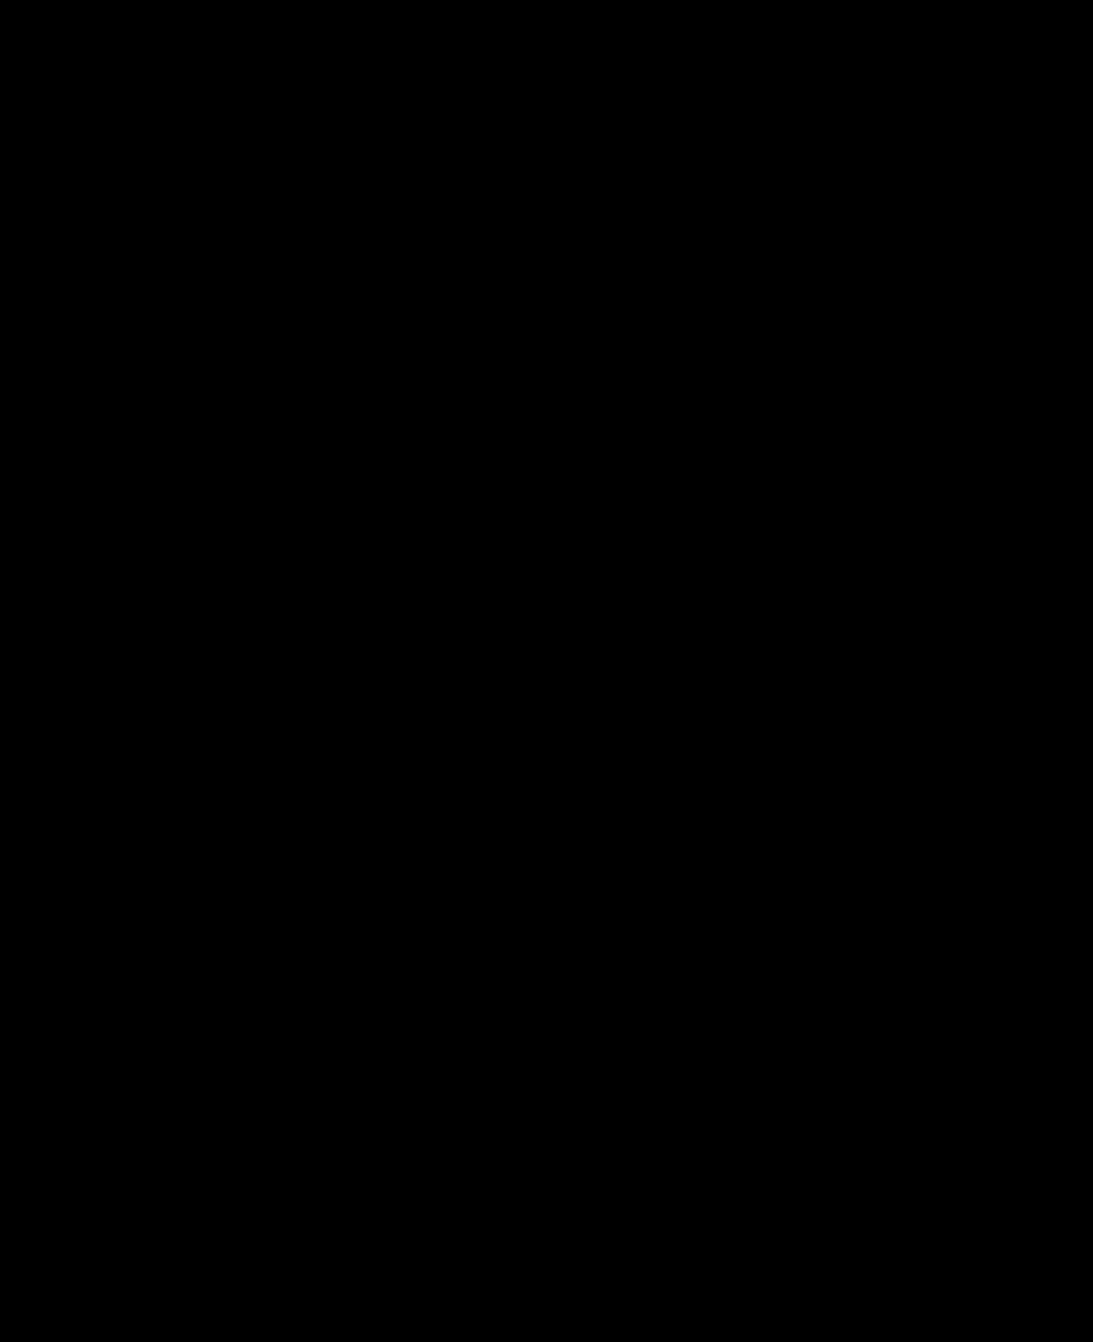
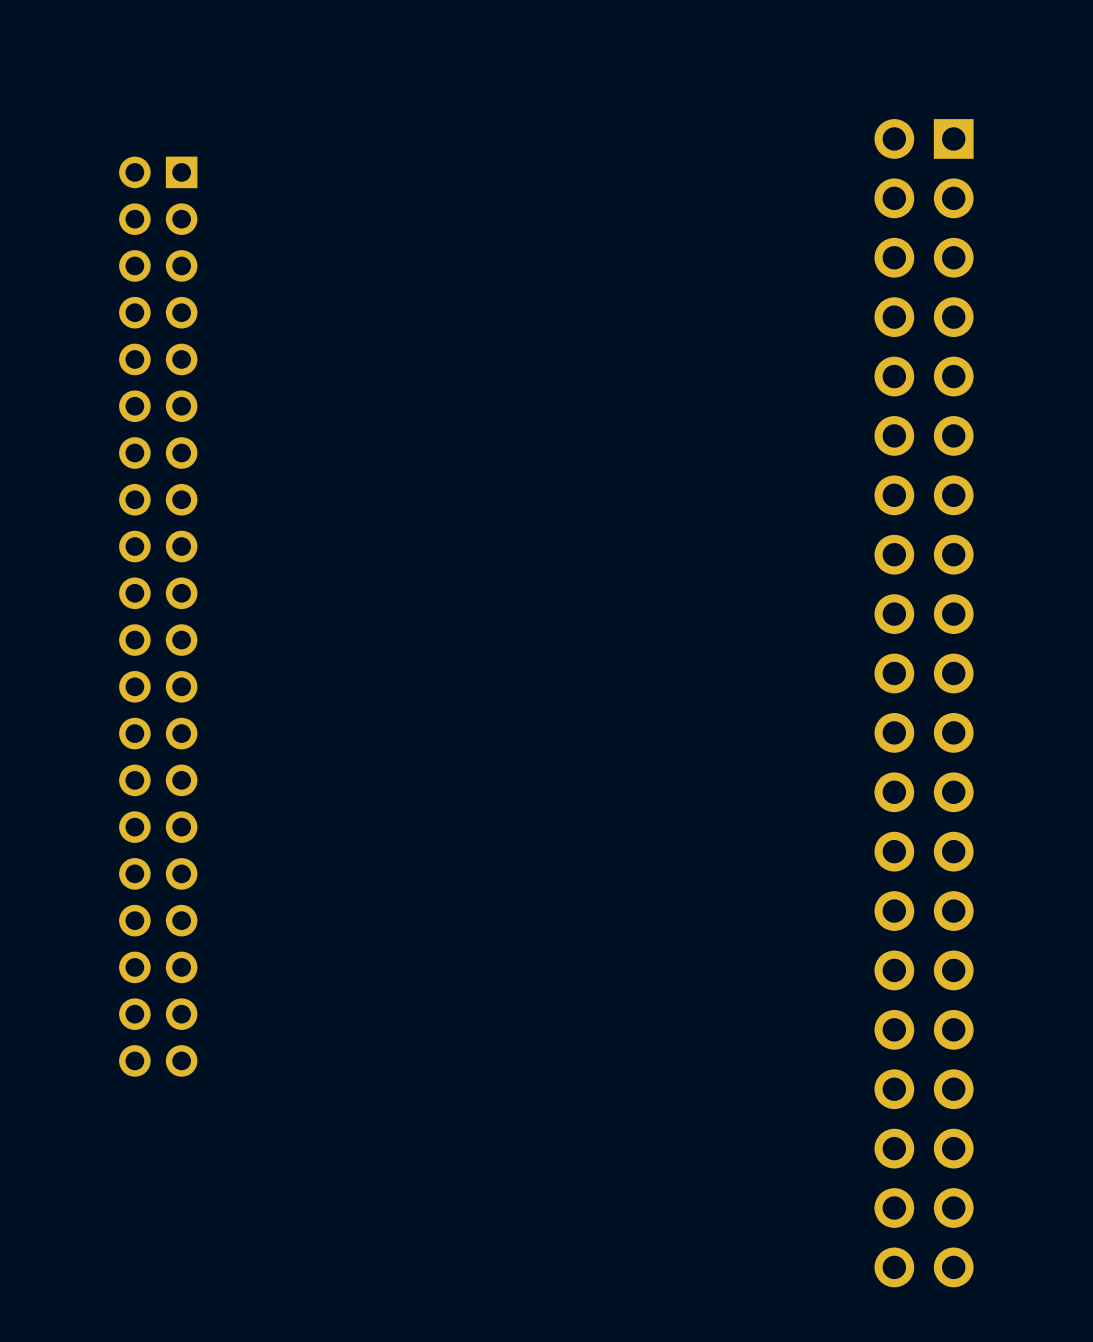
part: none -> (158, 616)
part: none -> (924, 703)

